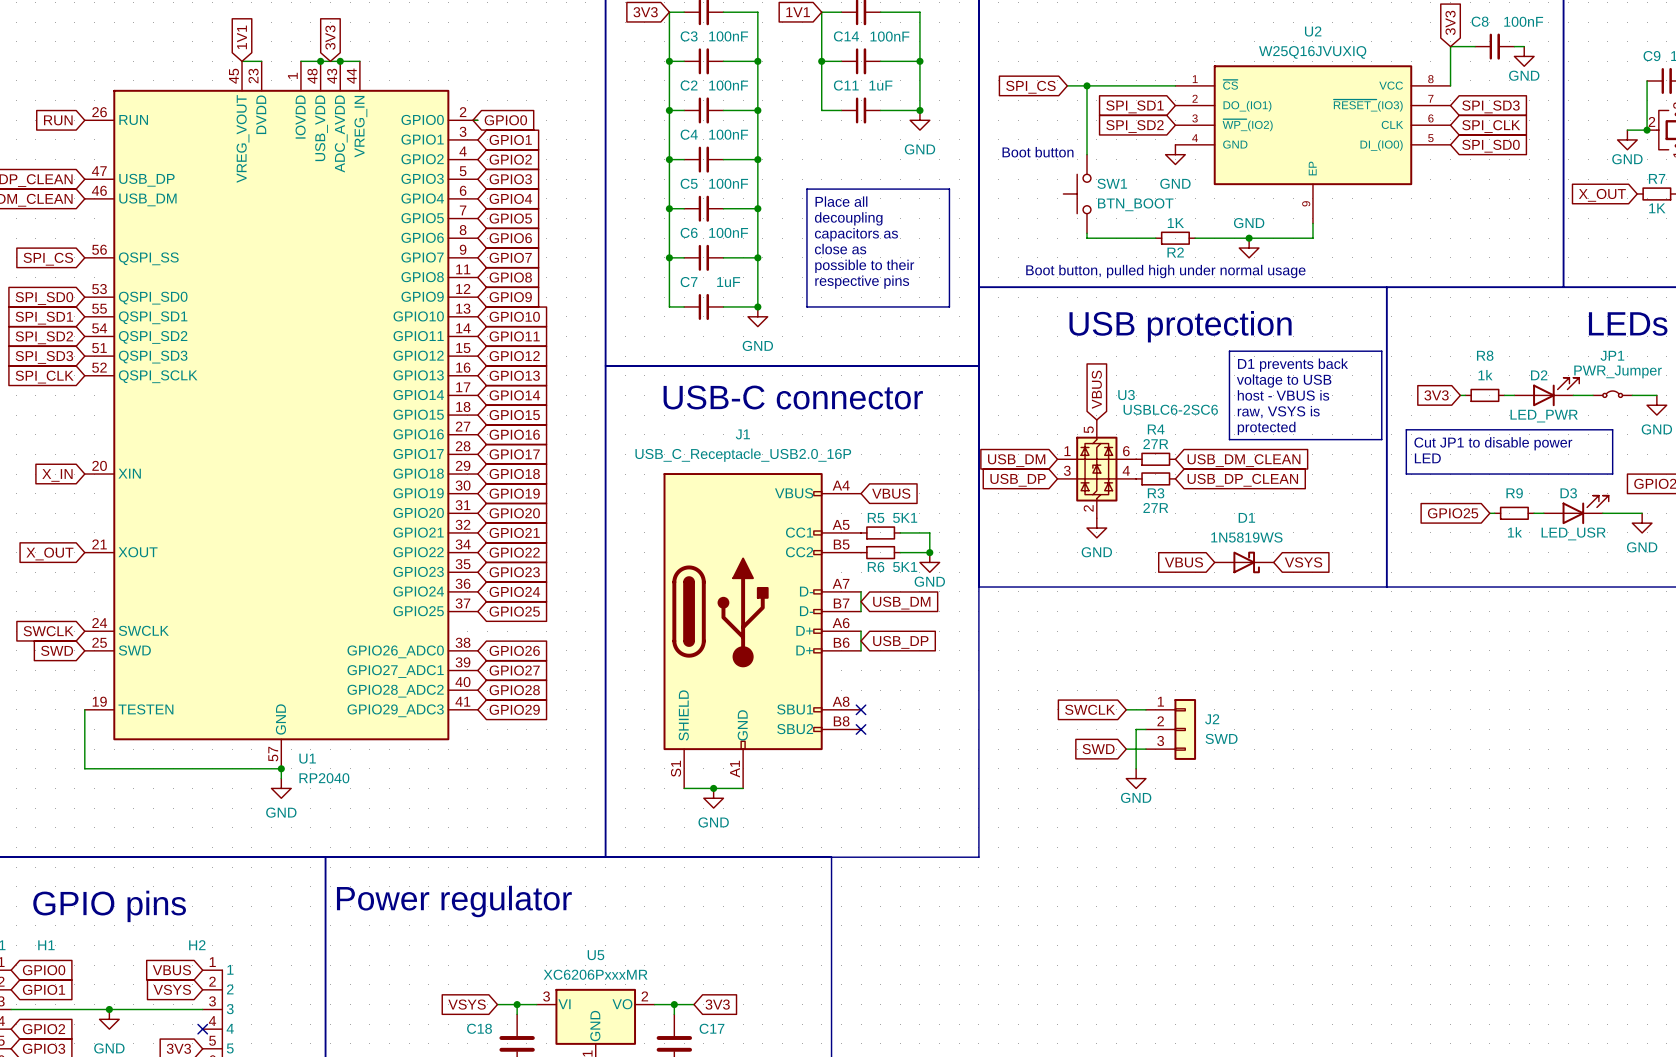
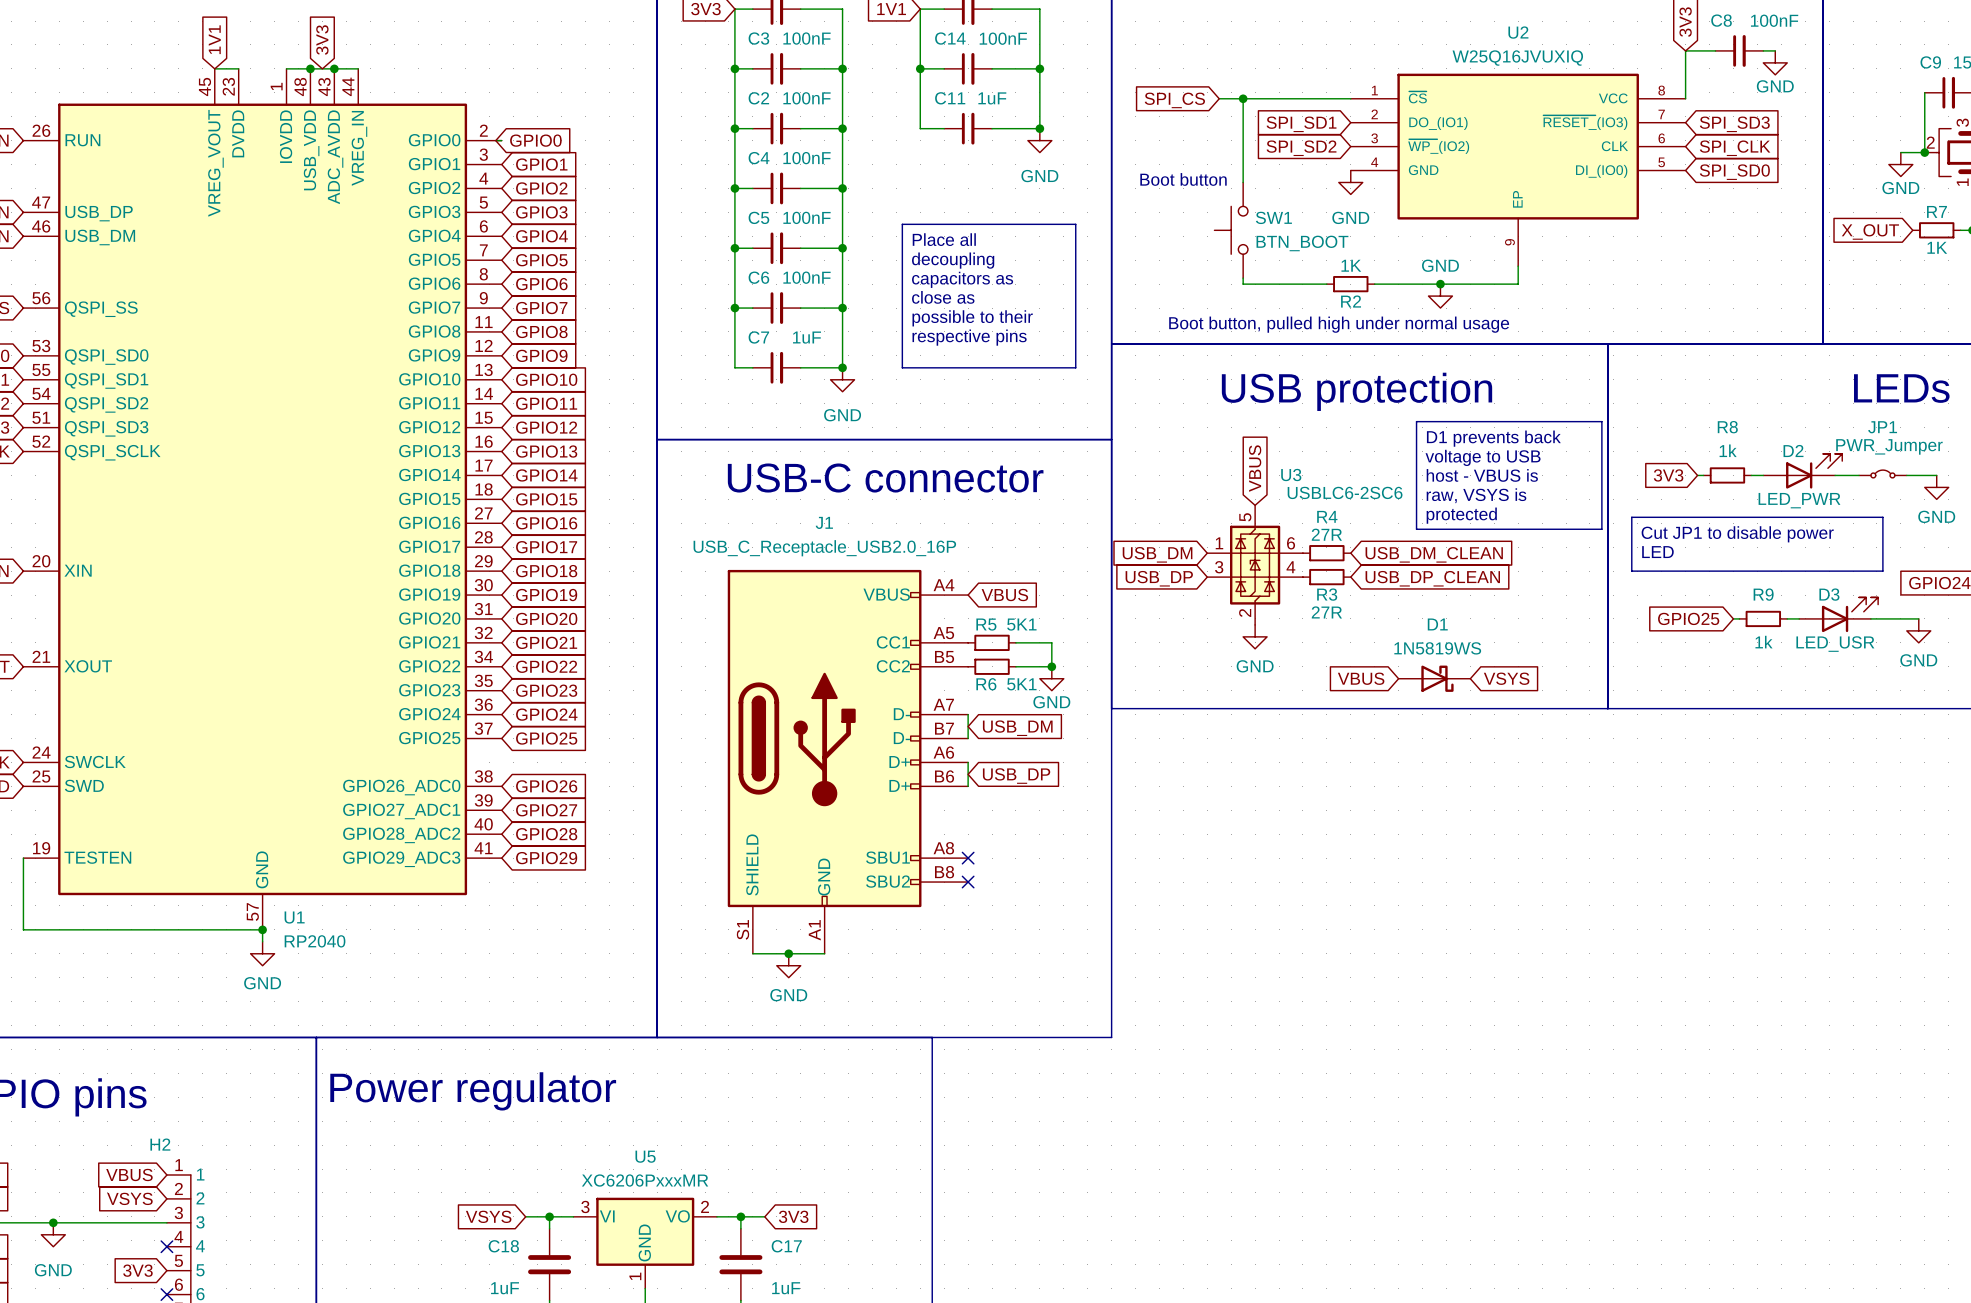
global label: SWCLK (1090, 709) -> none
wire: (1126, 709) (1145, 709) -> none
wire: (1145, 729) (1136, 729) (1136, 768) -> none
J2: SWD (1171, 729) -> none
global label: SWD (1098, 749) -> none
wire: (1126, 749) (1145, 749) -> none
power symbol: GND (1136, 778) -> none

